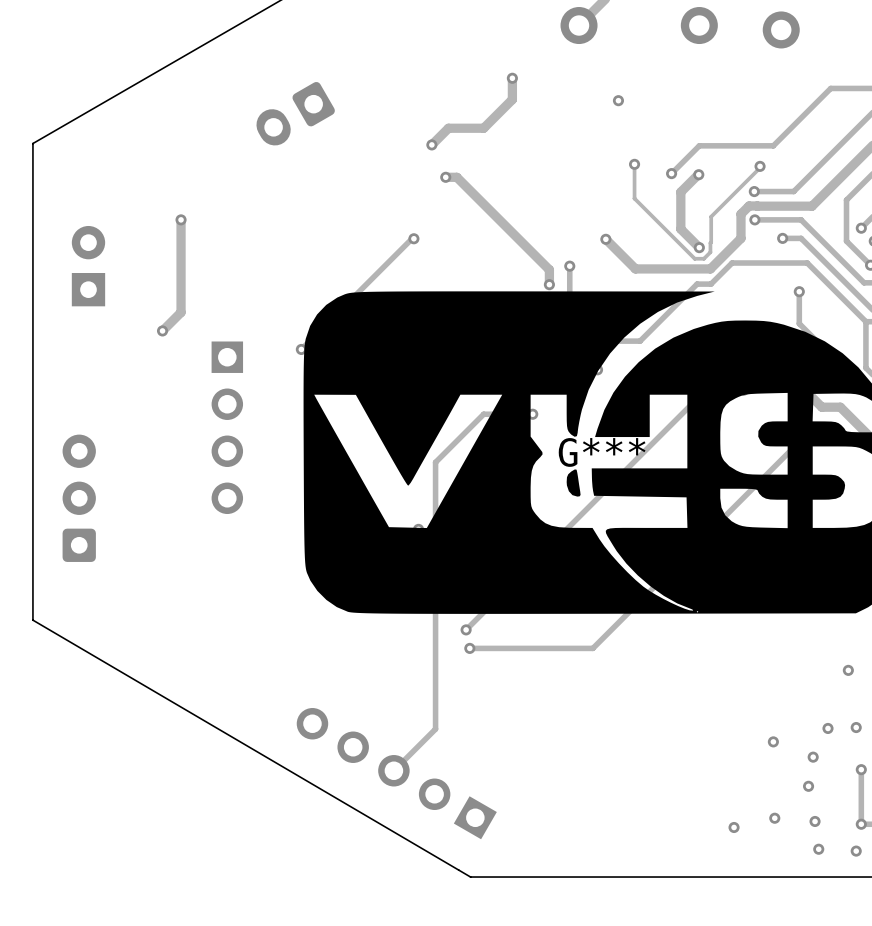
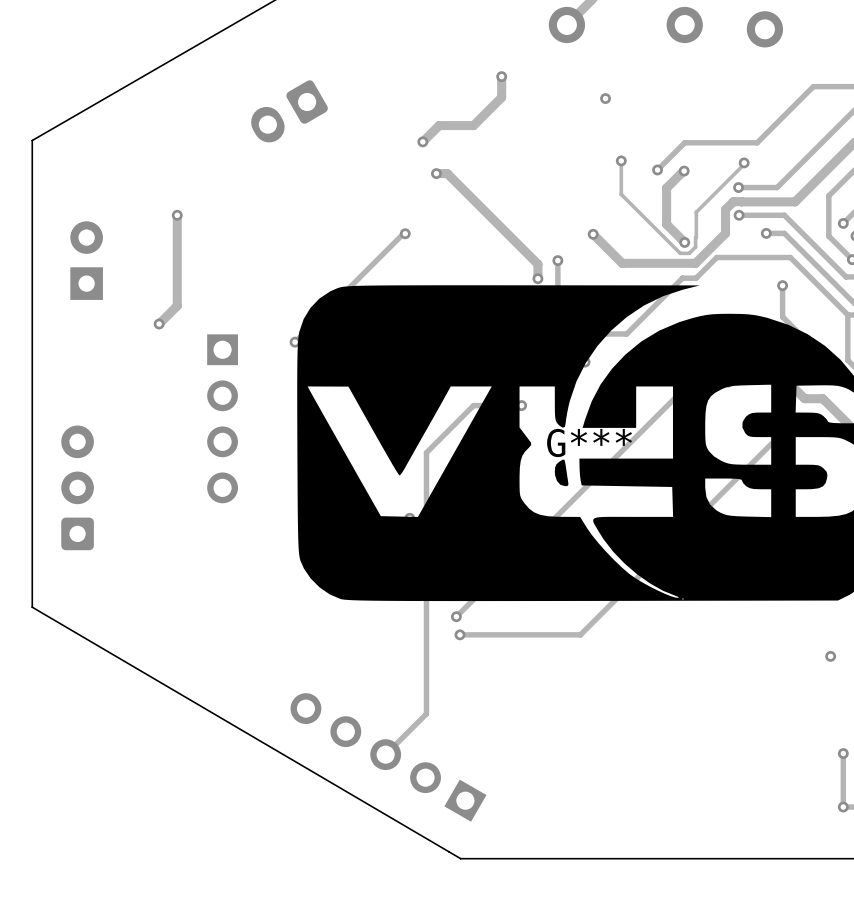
via: (856, 727) -> none
via: (827, 728) -> none
via: (773, 741) -> none
via: (813, 757) -> none
via: (808, 786) -> none
via: (774, 818) -> none
via: (815, 821) -> none
via: (734, 827) -> none
via: (818, 849) -> none
via: (856, 851) -> none

